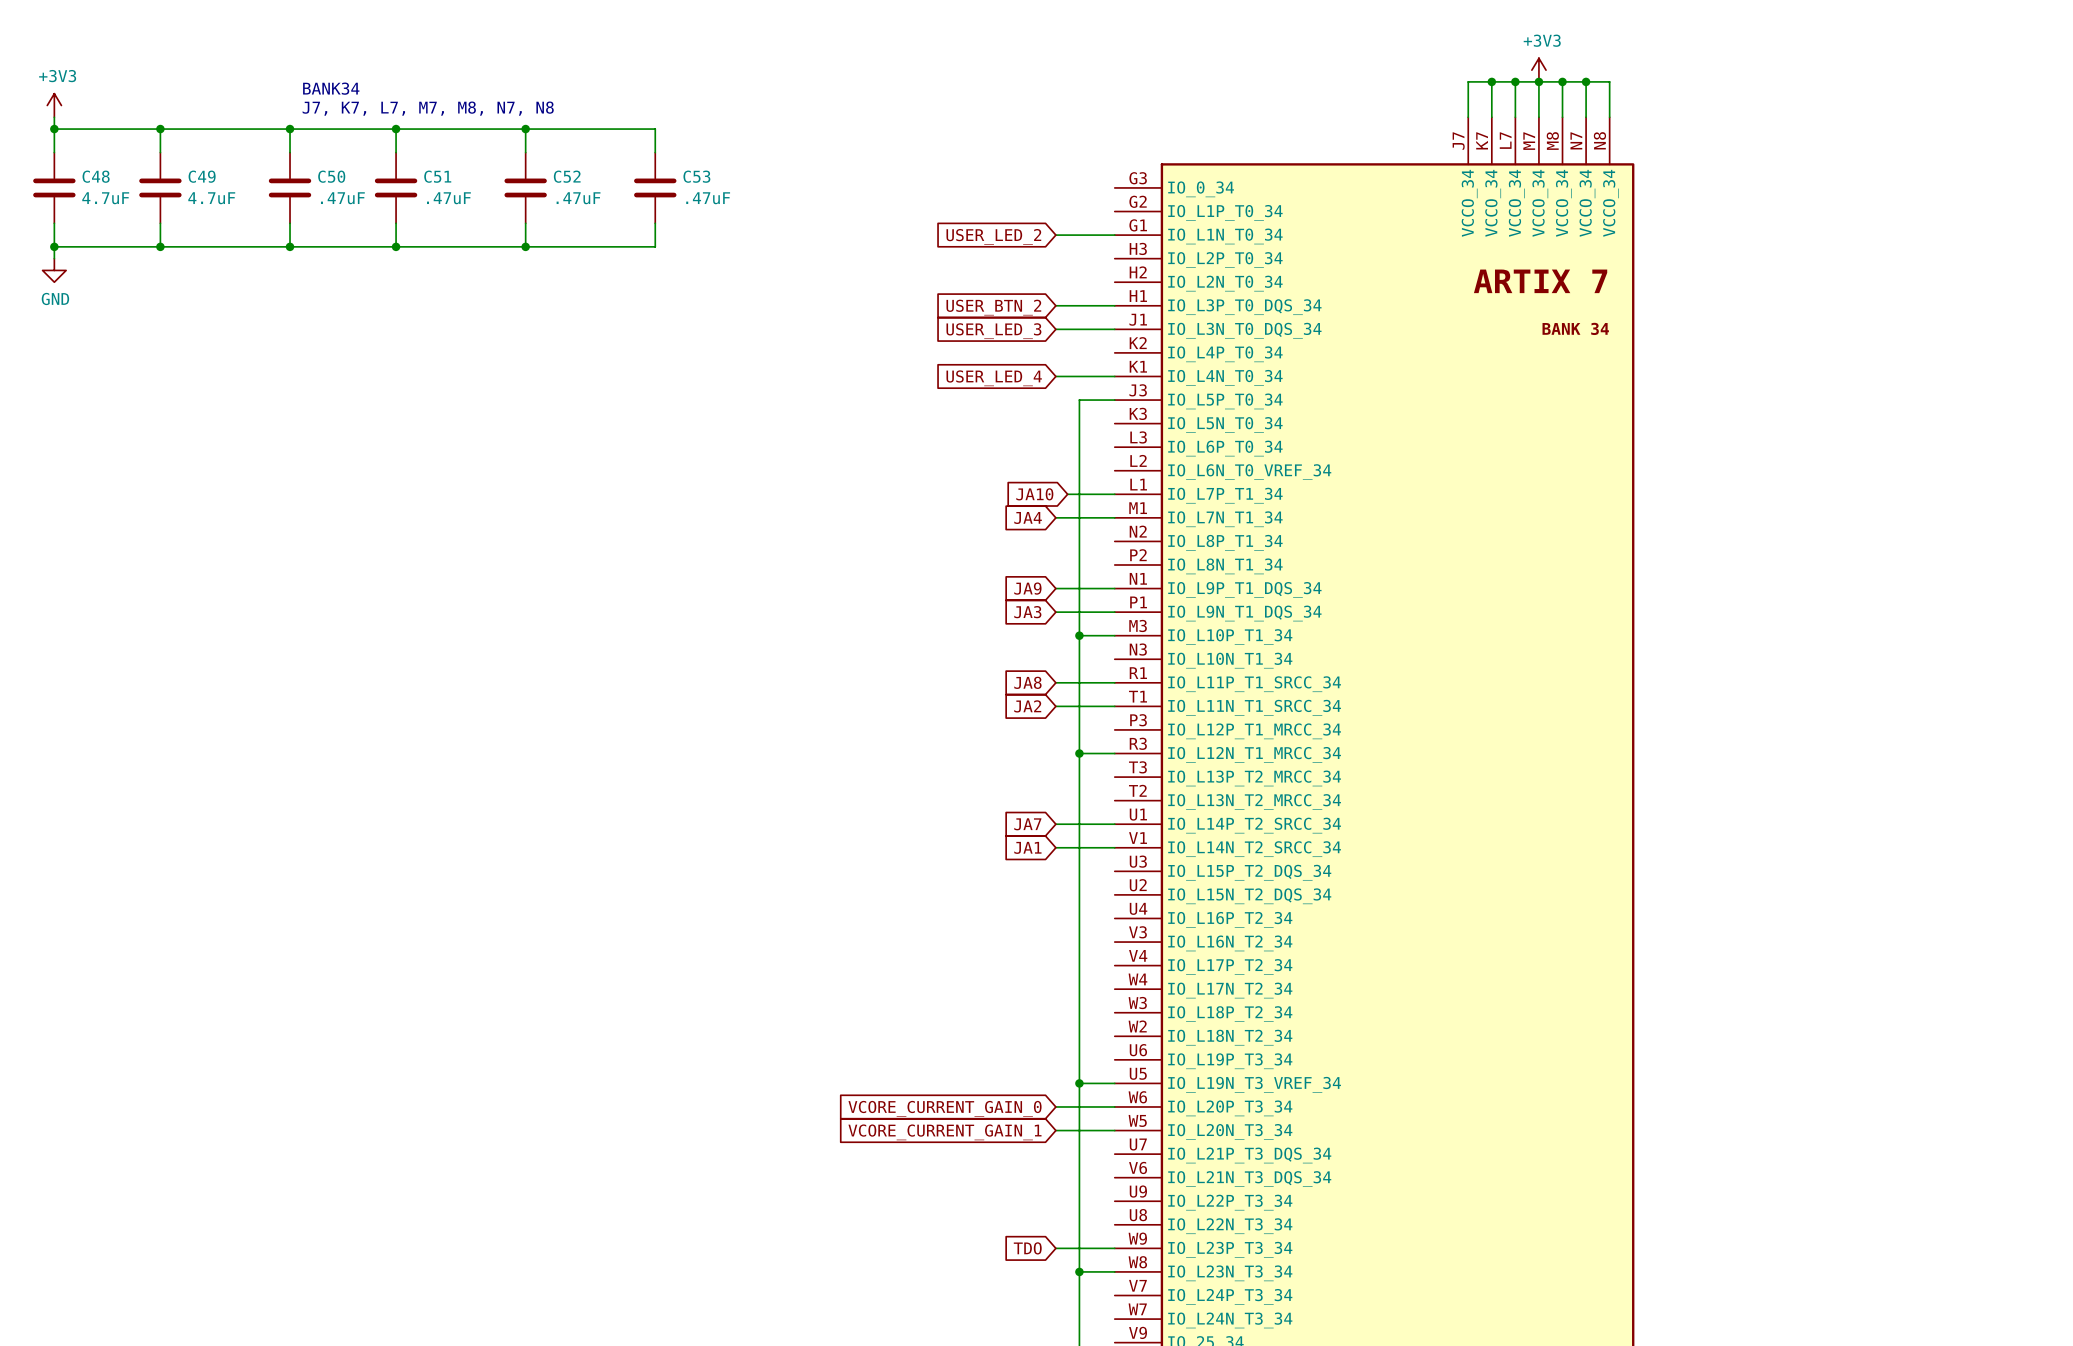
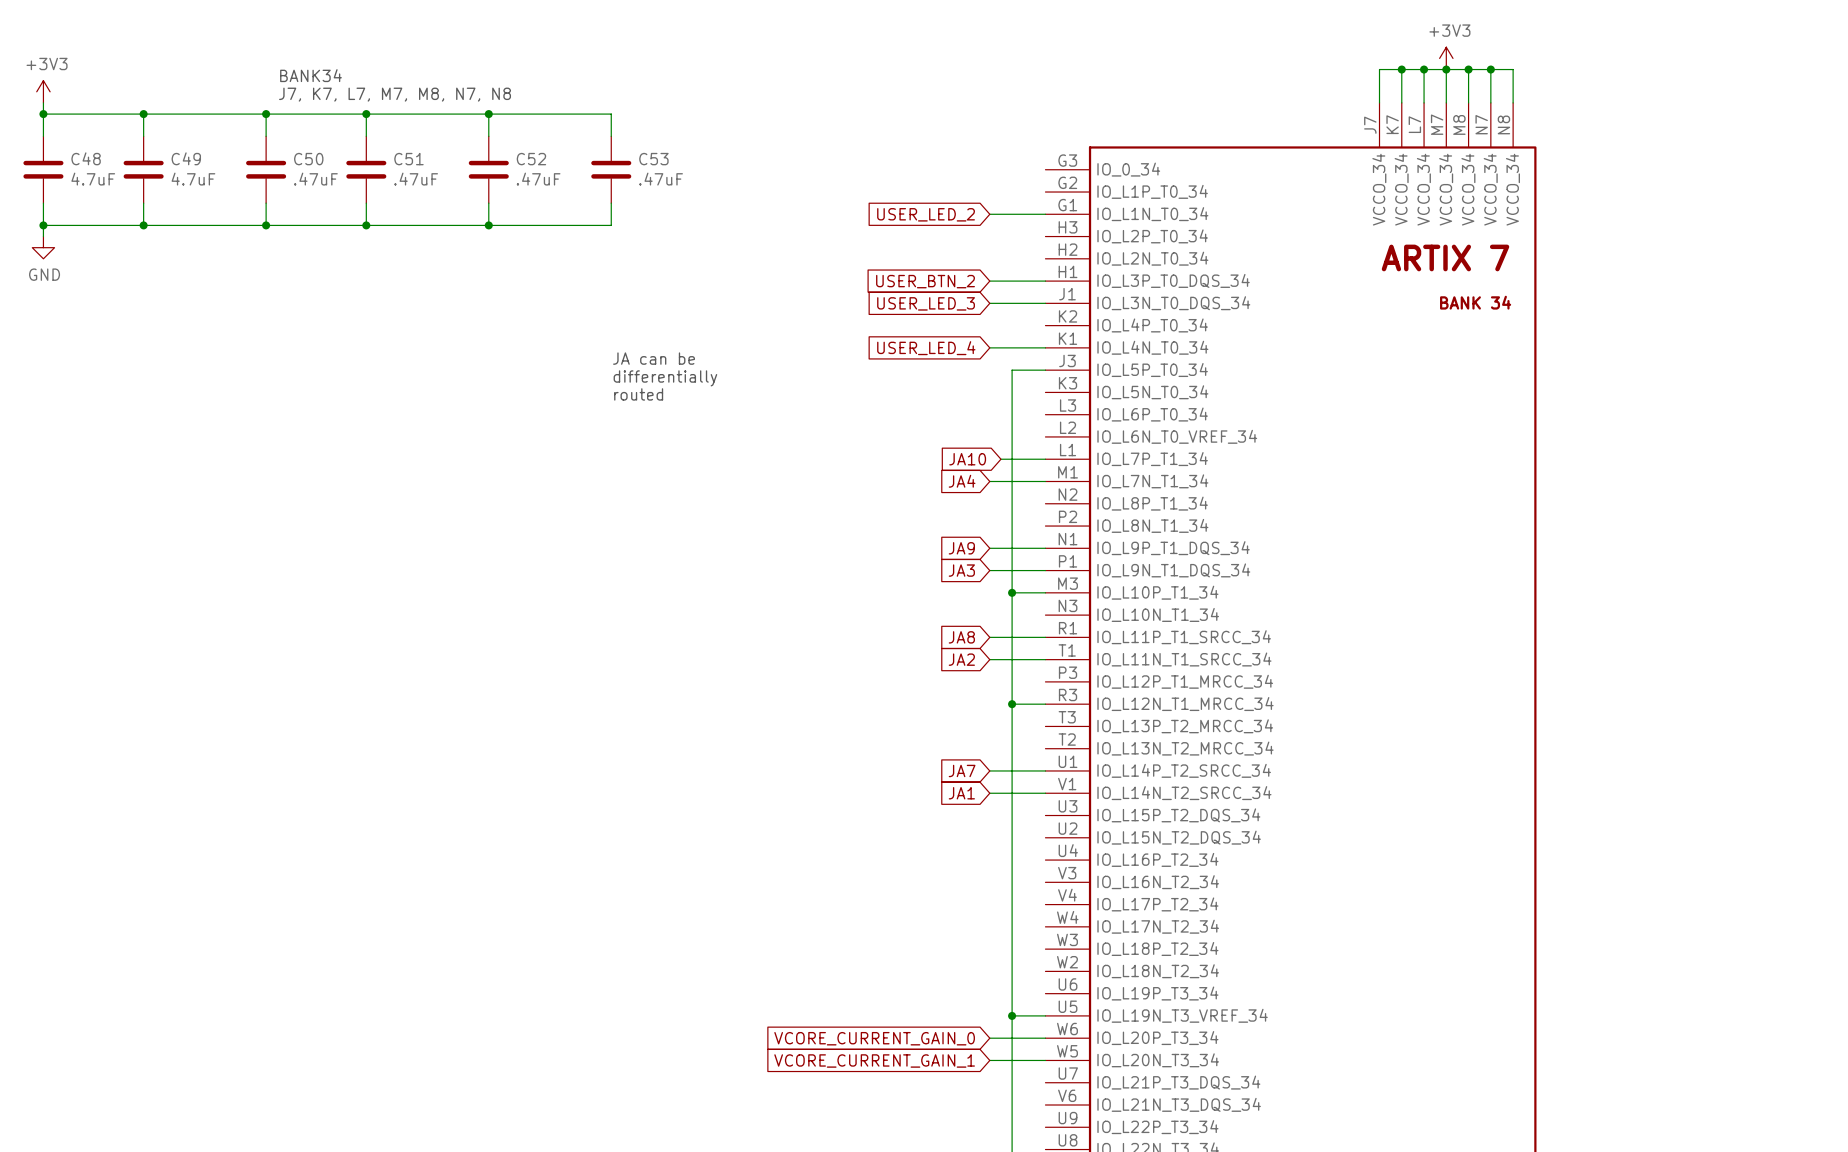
text: none -> JA can be (654, 358)
text: none -> differentially (665, 378)
text: none -> routed (638, 394)

